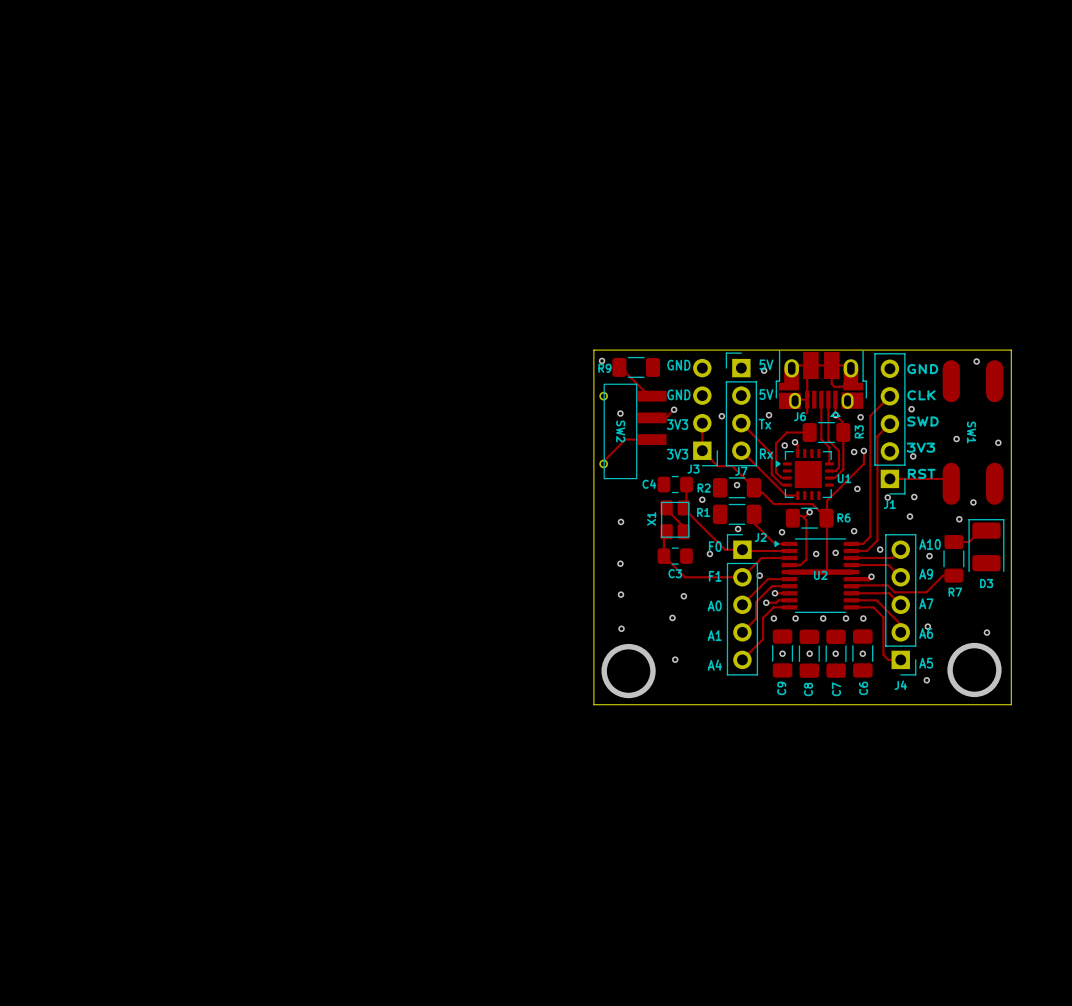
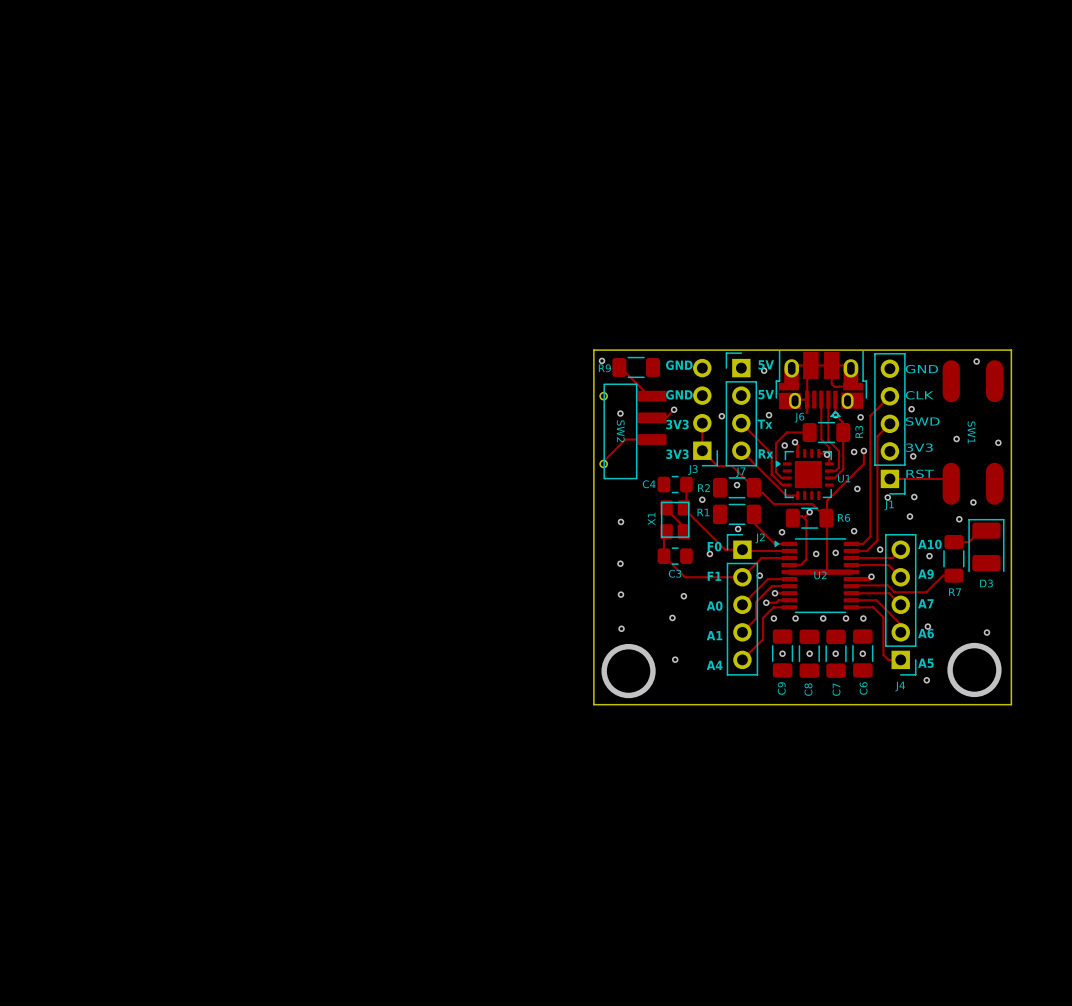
track: none -> (818, 453) (827, 454)
via: none -> (827, 454)

